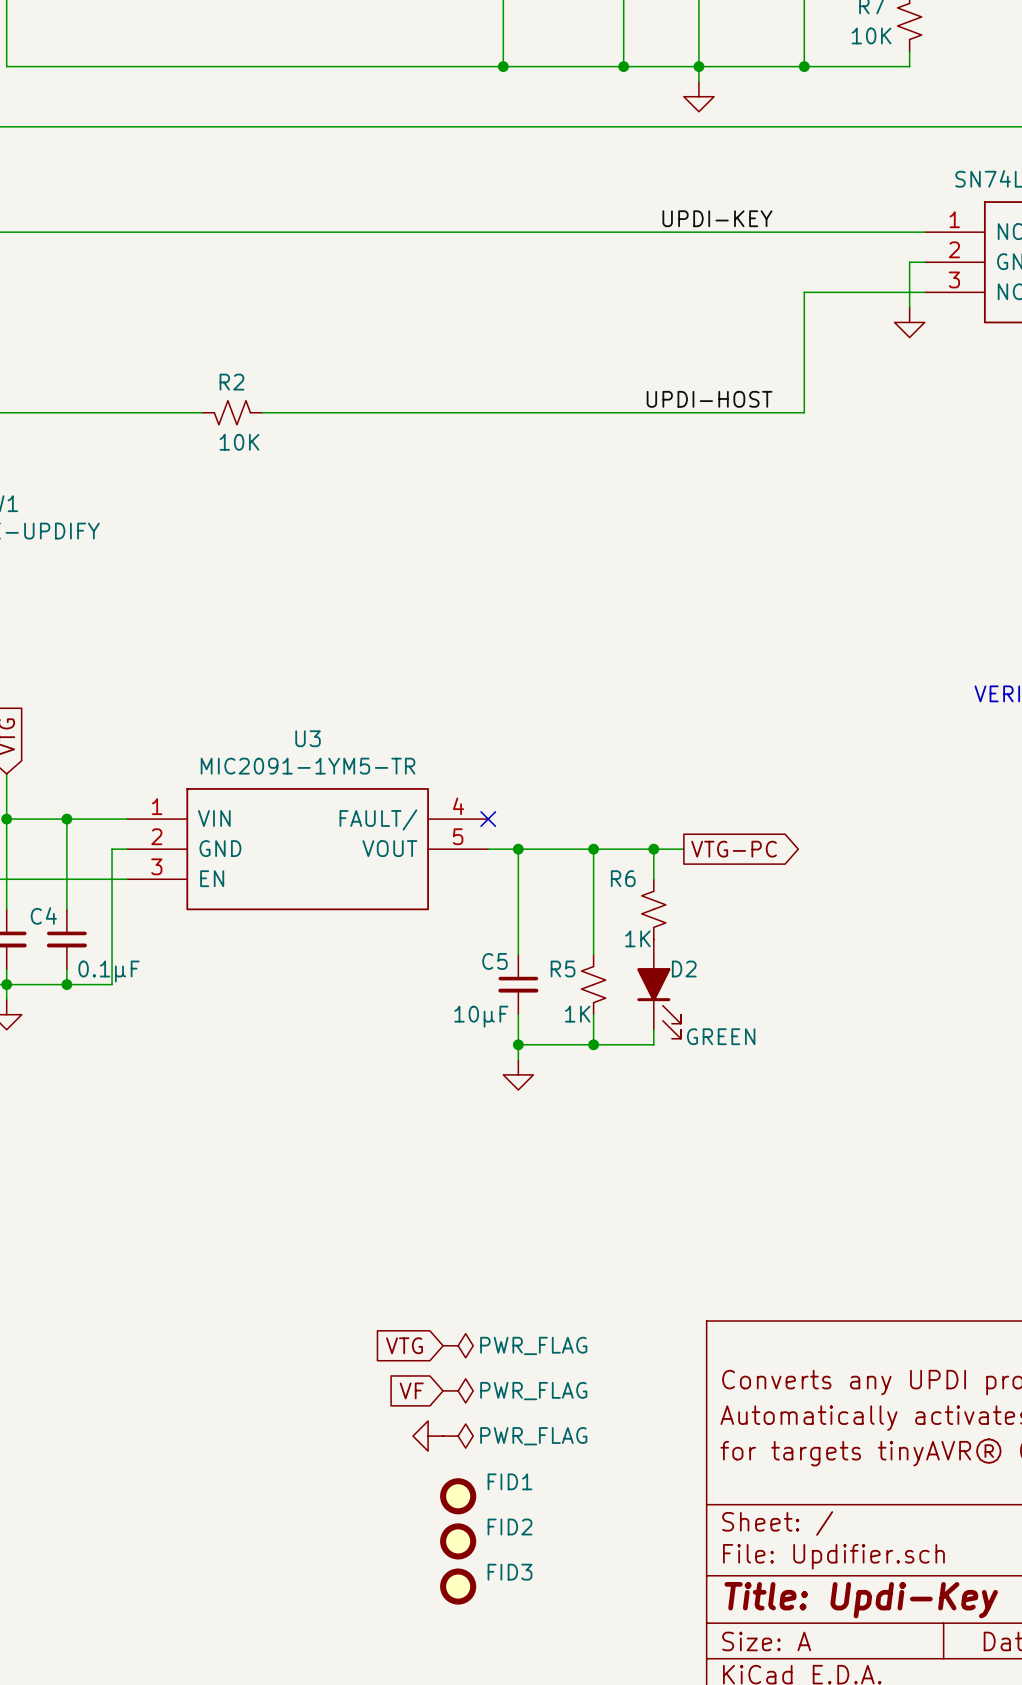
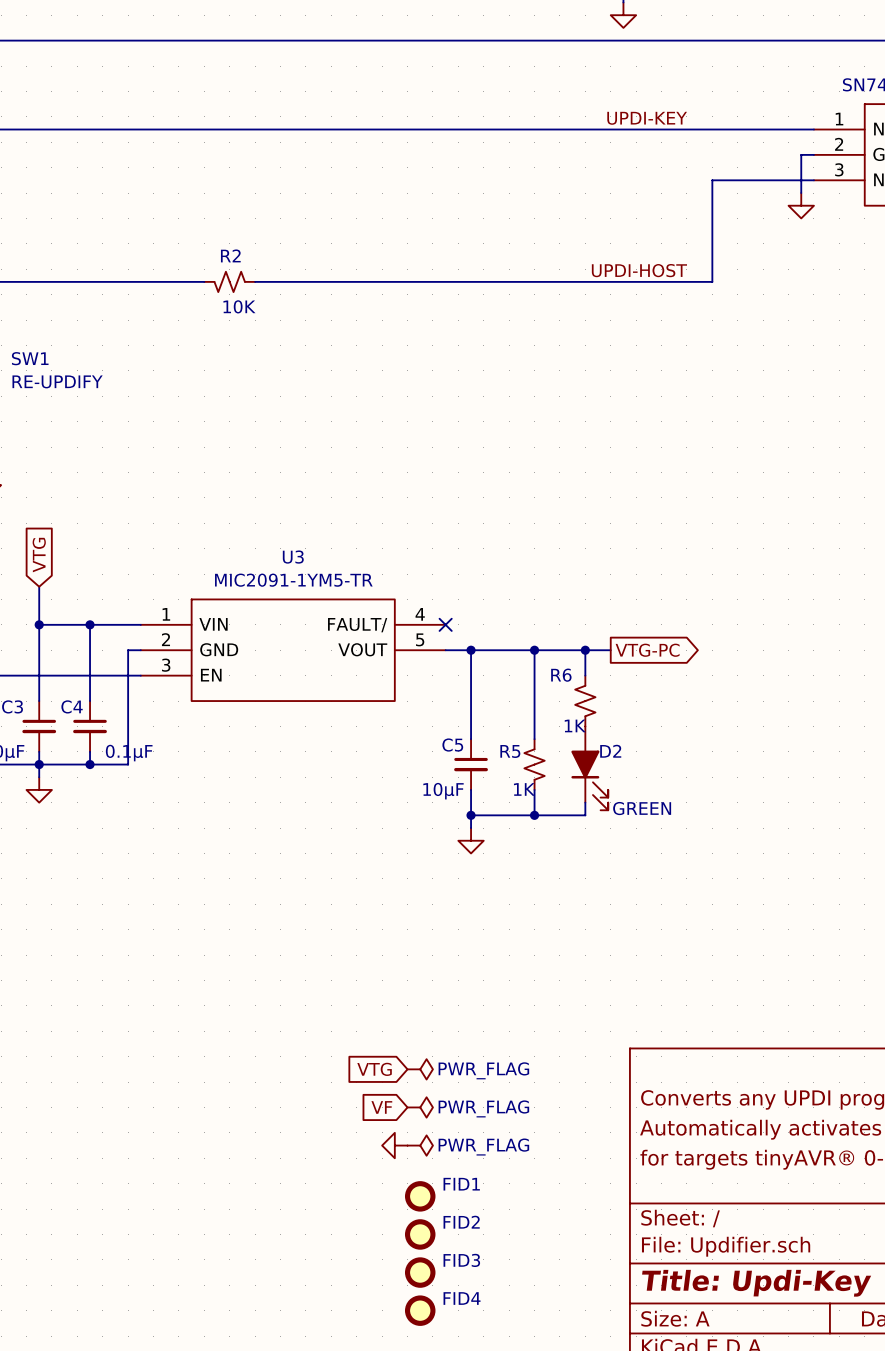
FID4: none -> (420, 1310)

